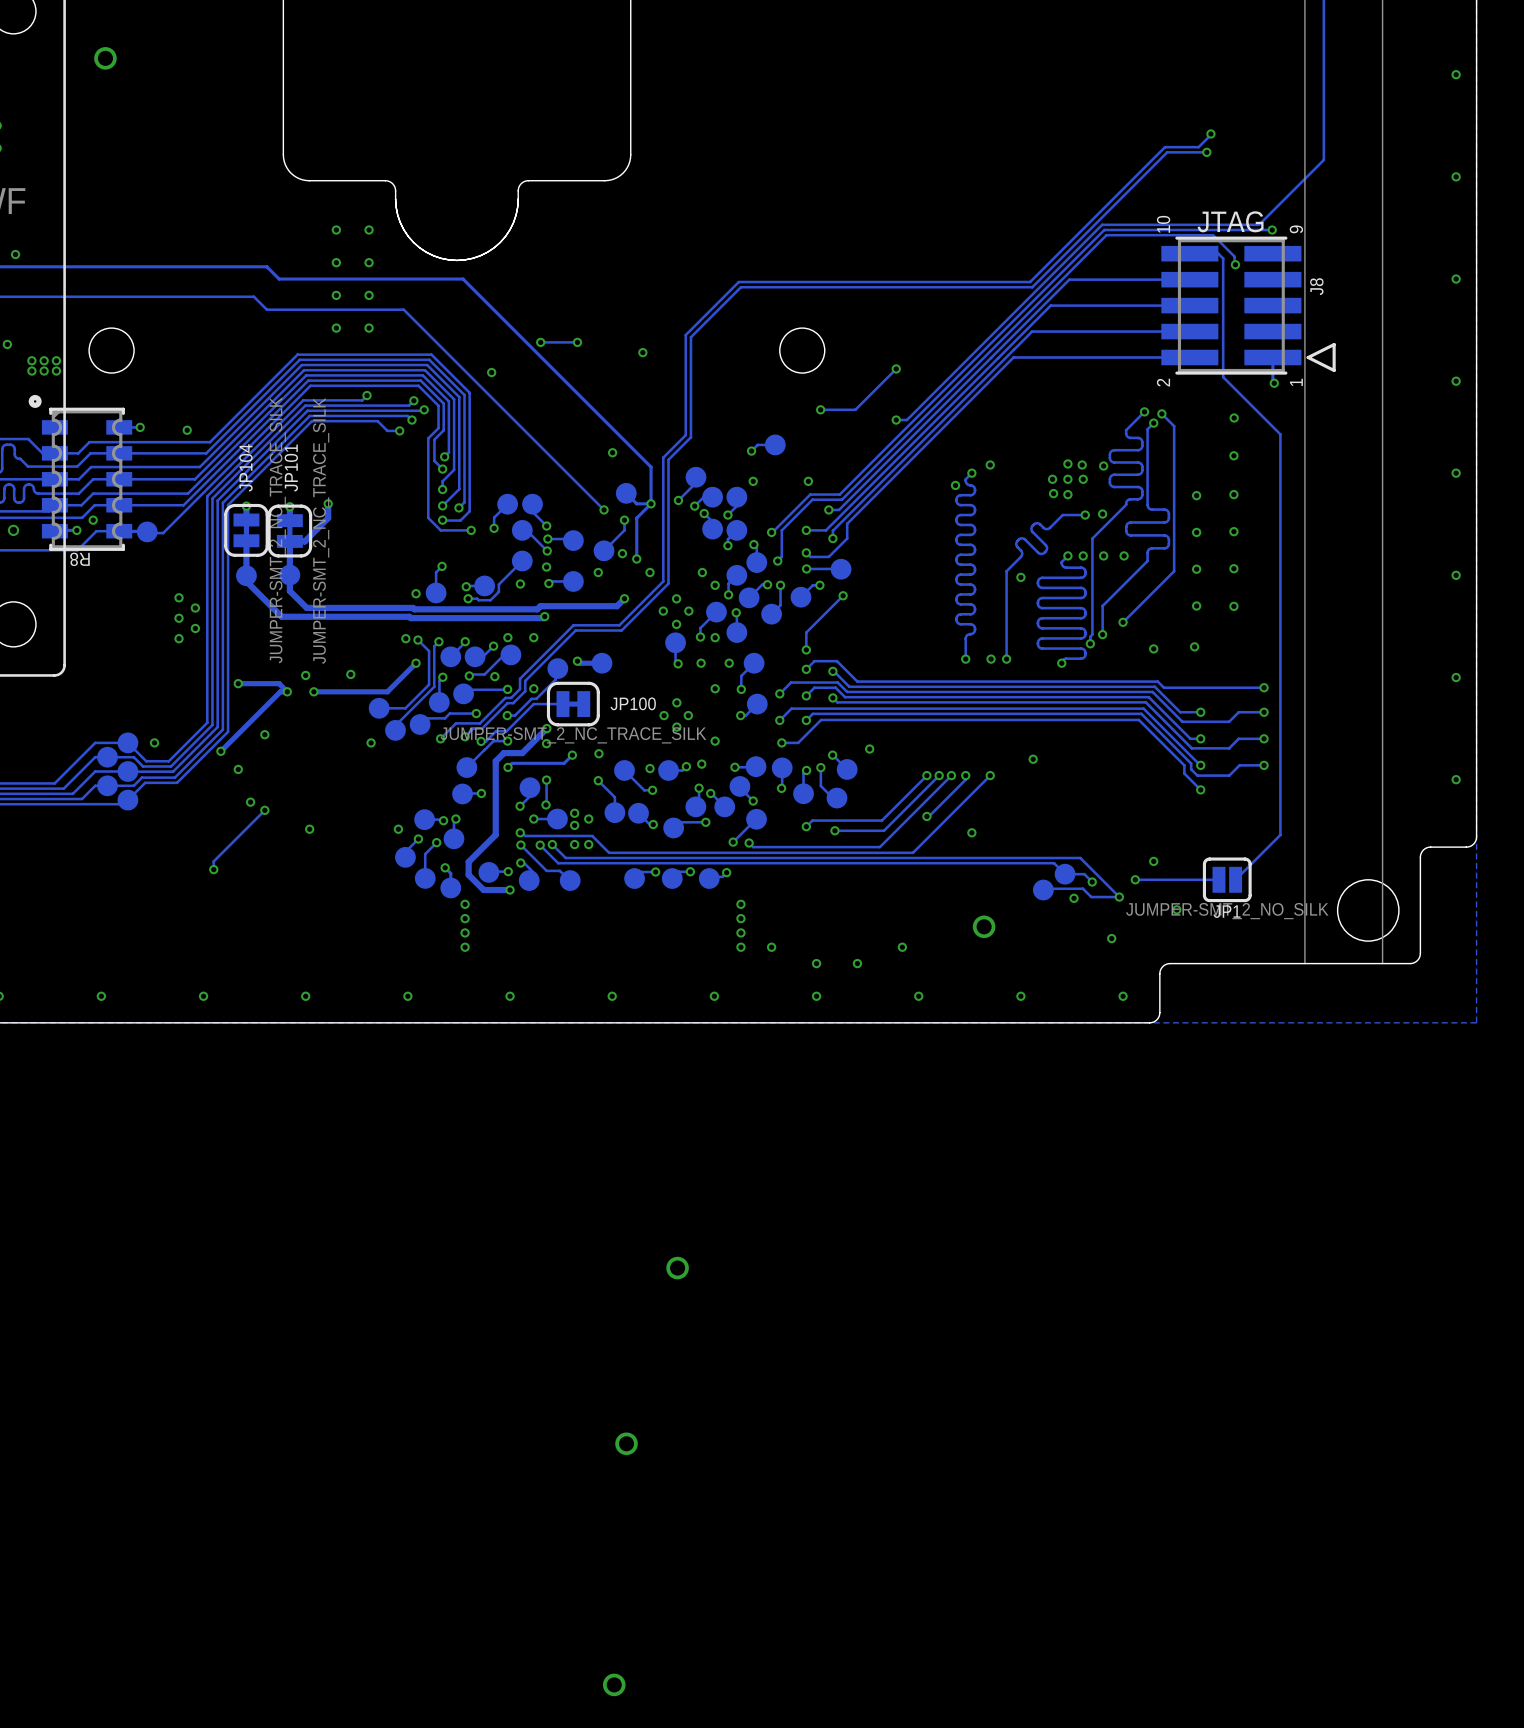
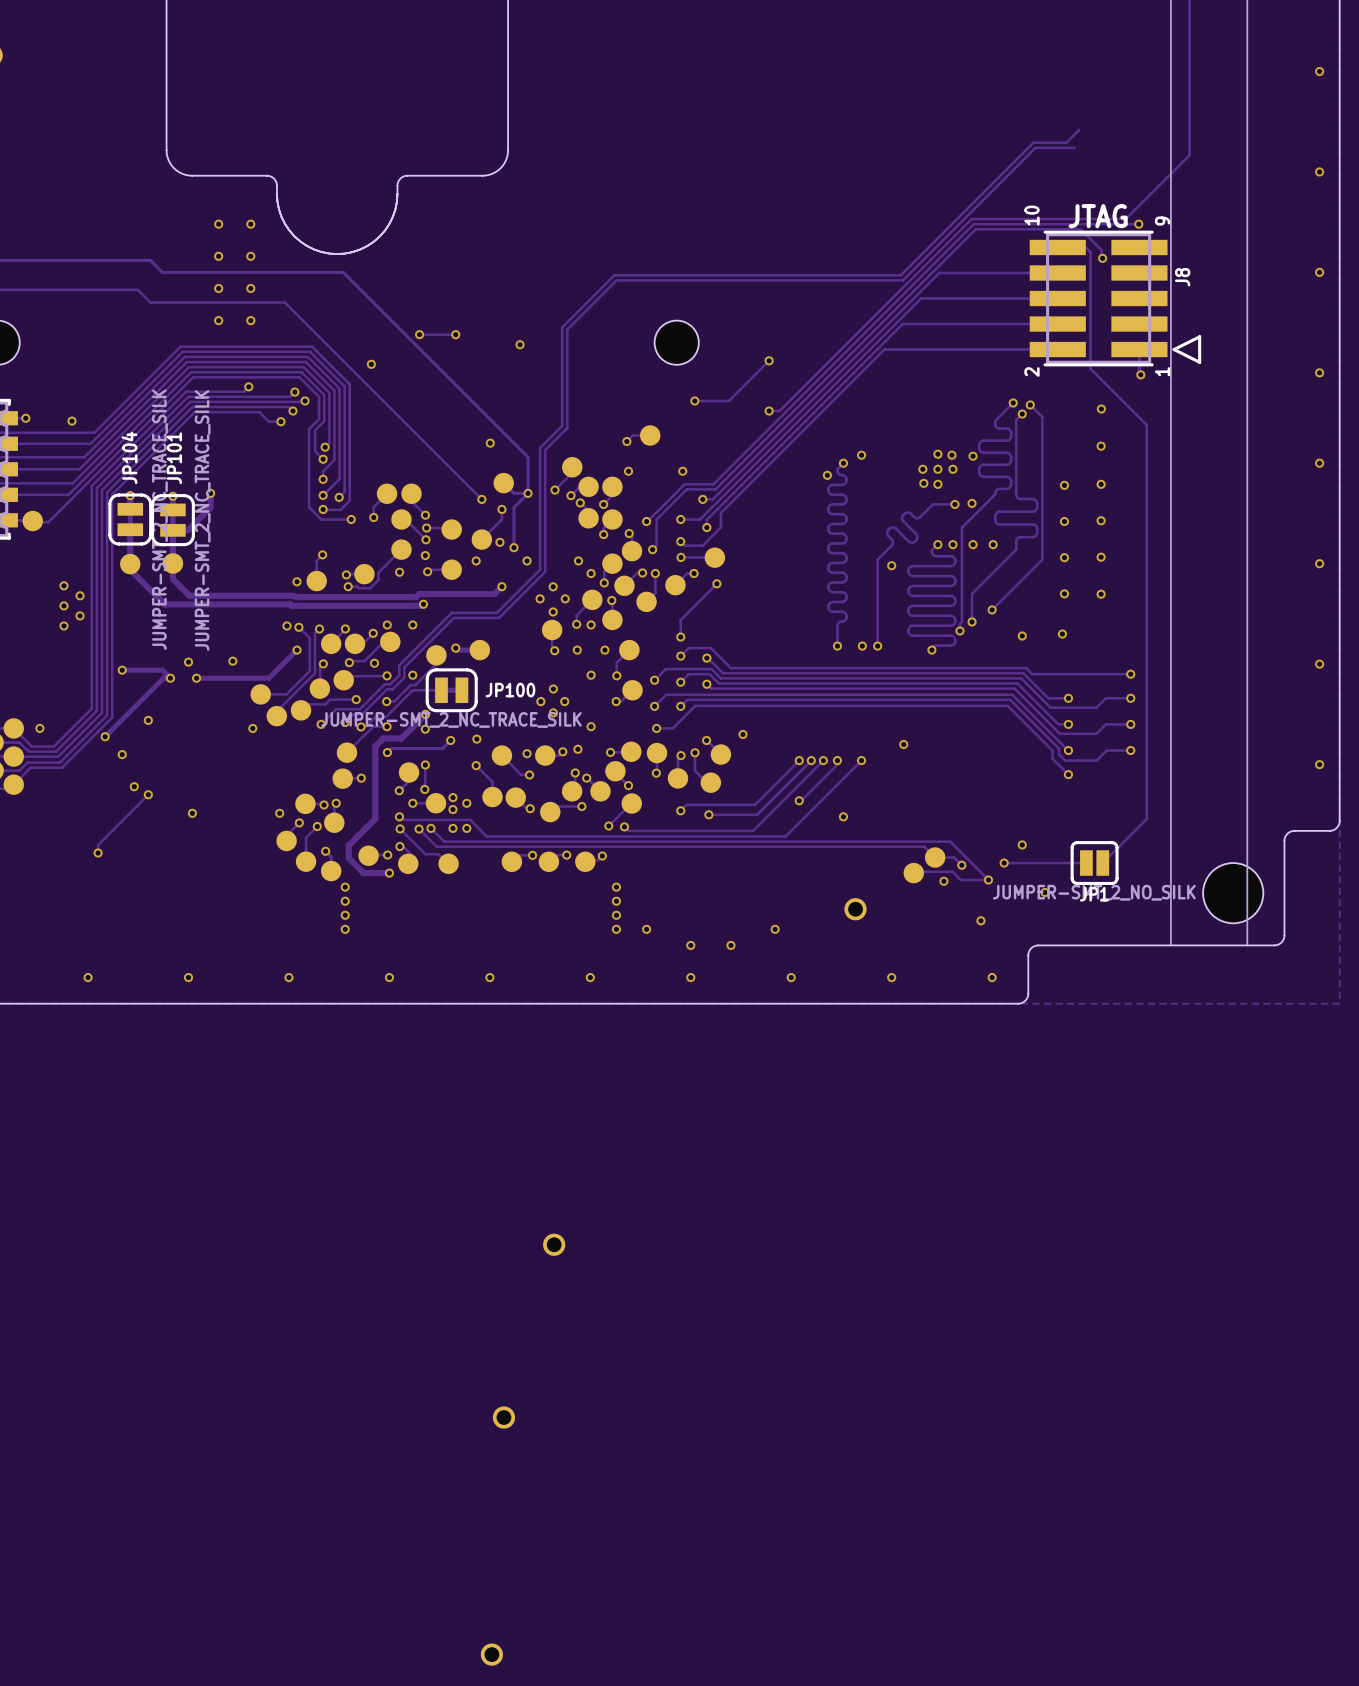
via: (1210, 133) -> none
via: (1206, 152) -> none

